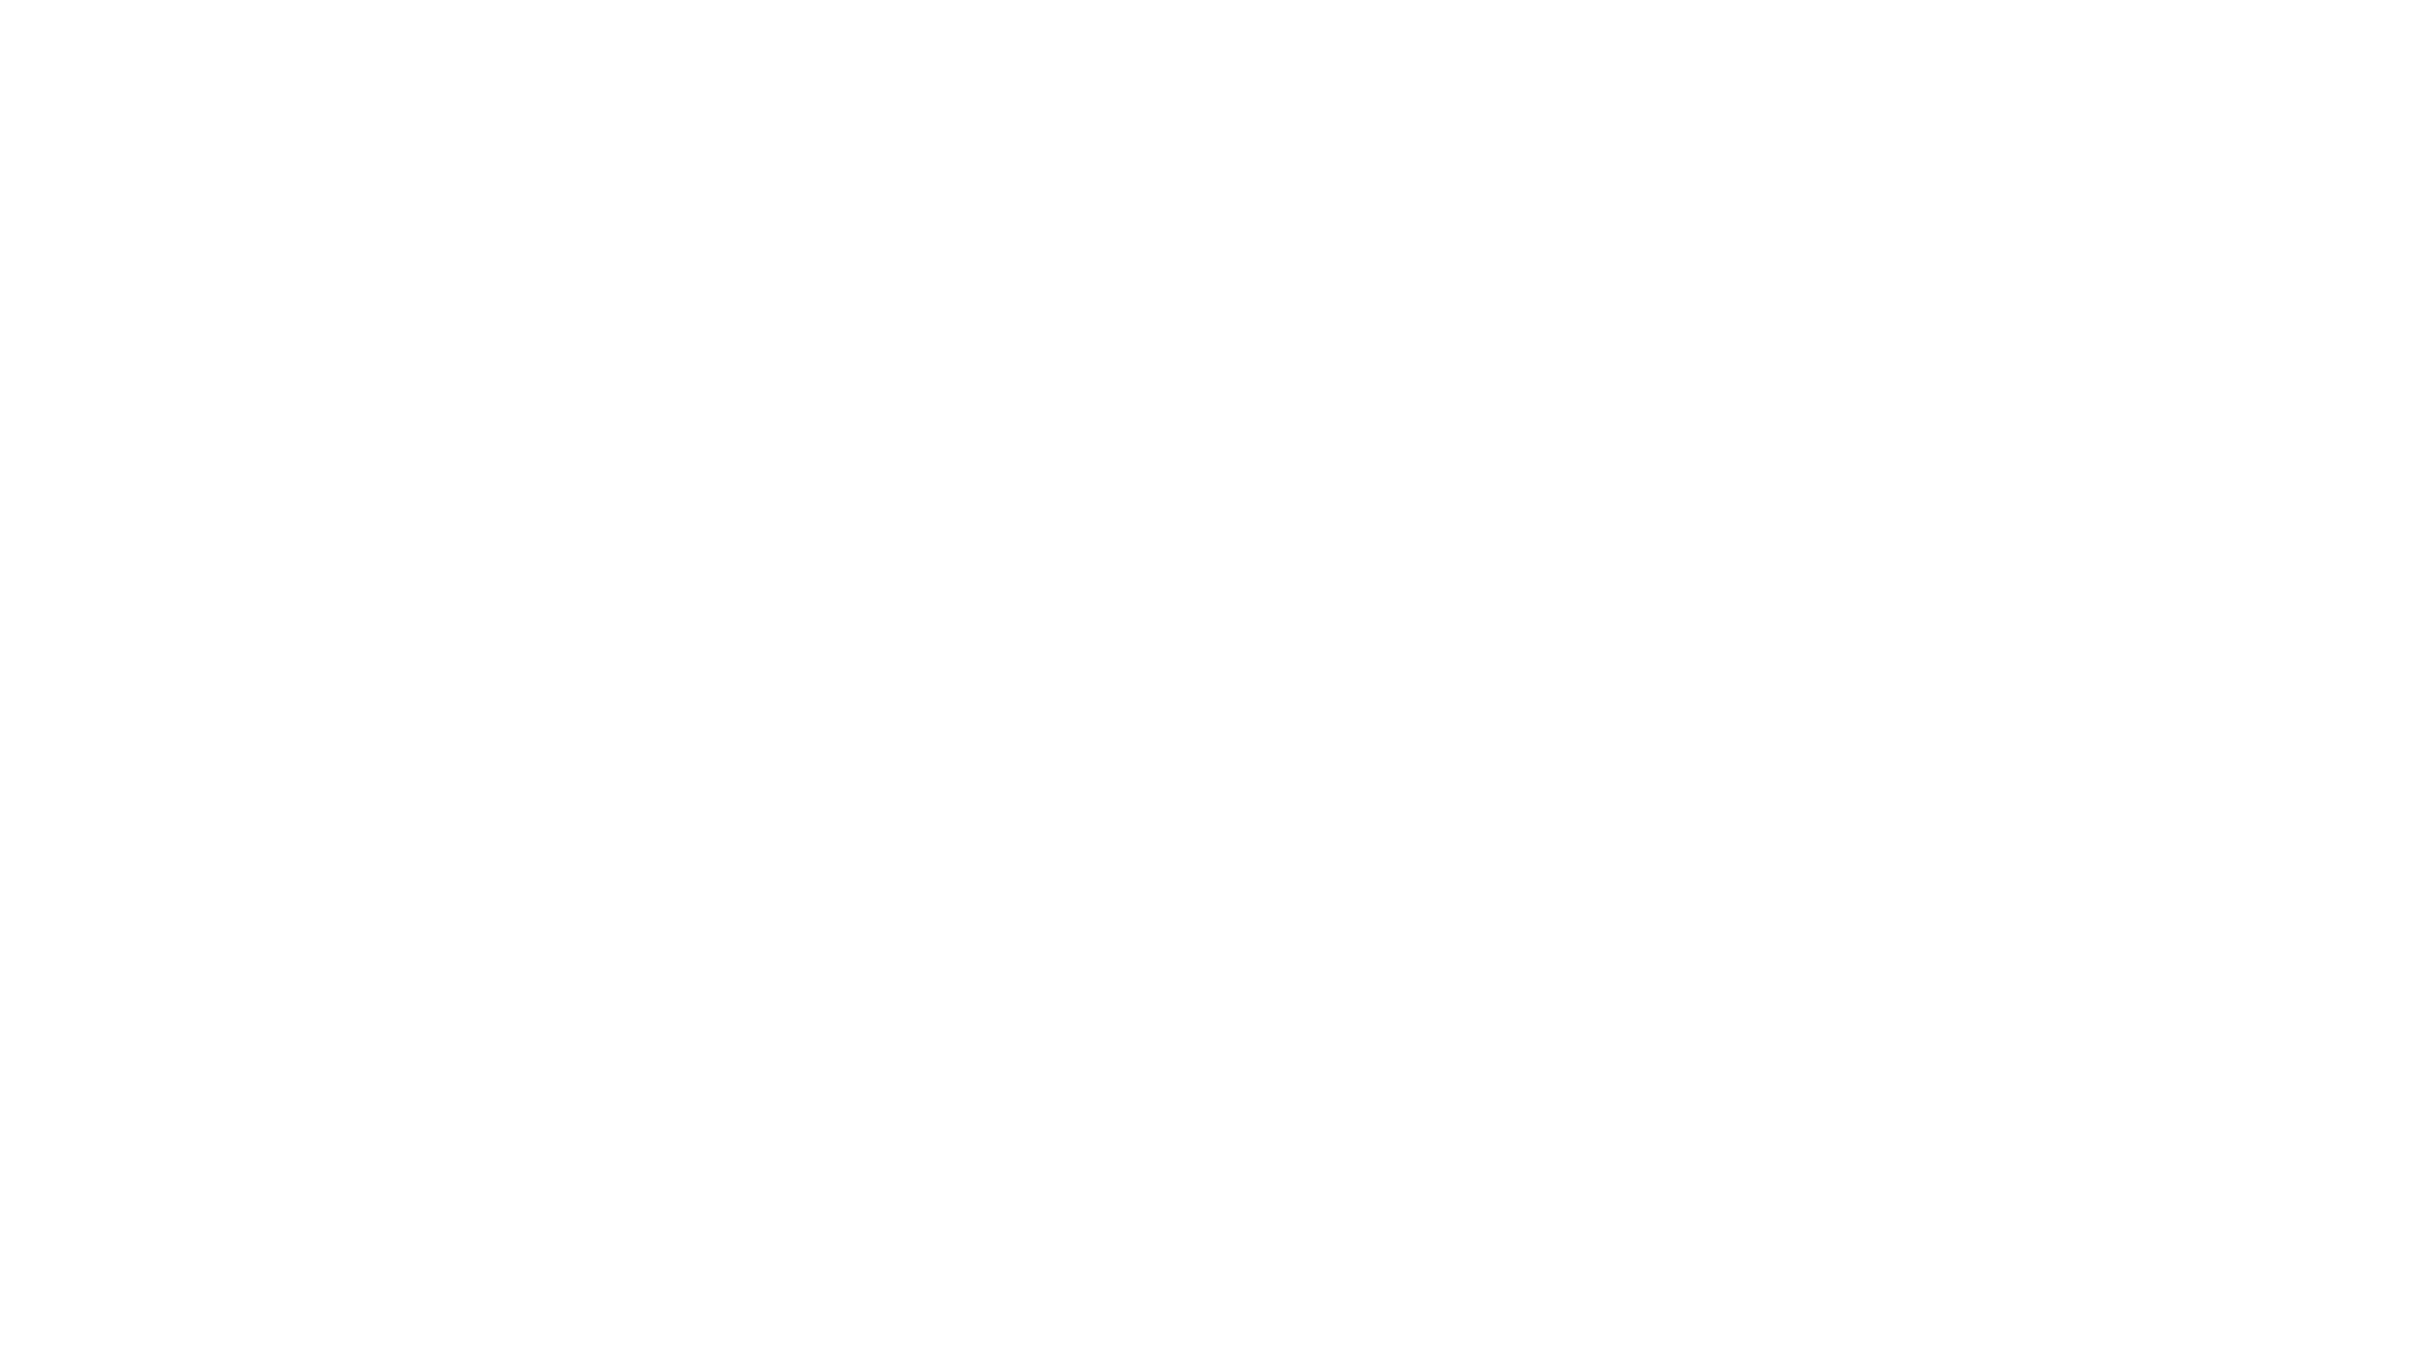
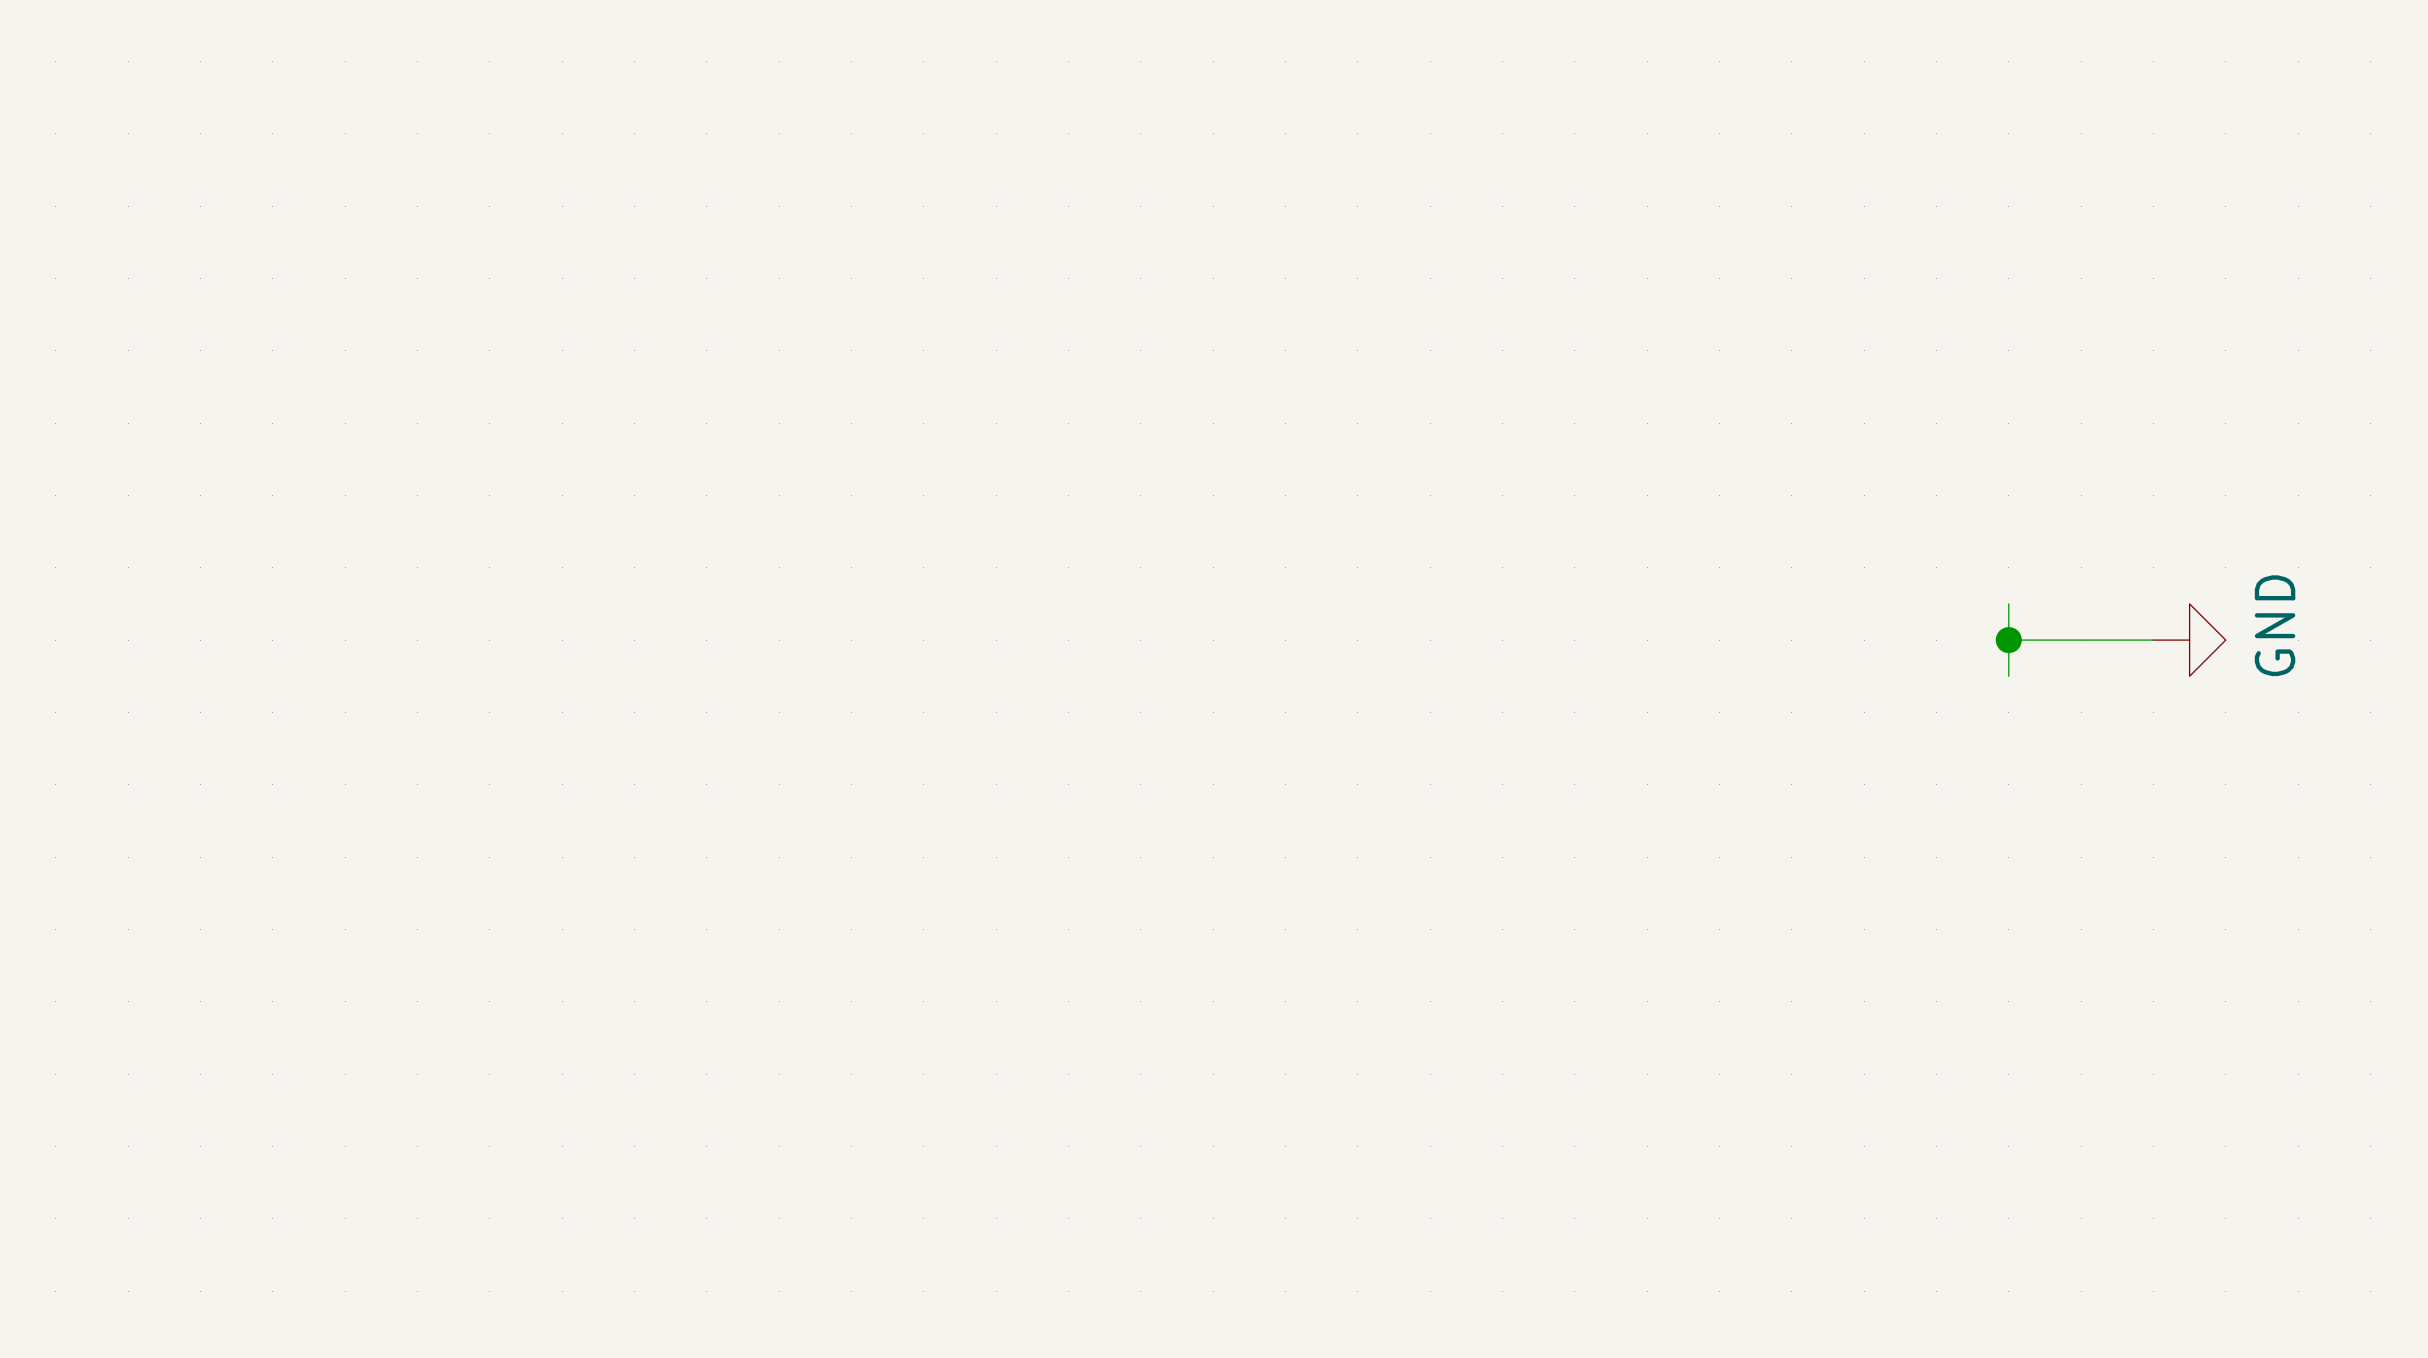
wire: none -> (2008, 603) (2008, 676)
wire: none -> (2008, 640) (2153, 640)
junction: none -> (2008, 640)
power symbol: none -> GND (2189, 640)

